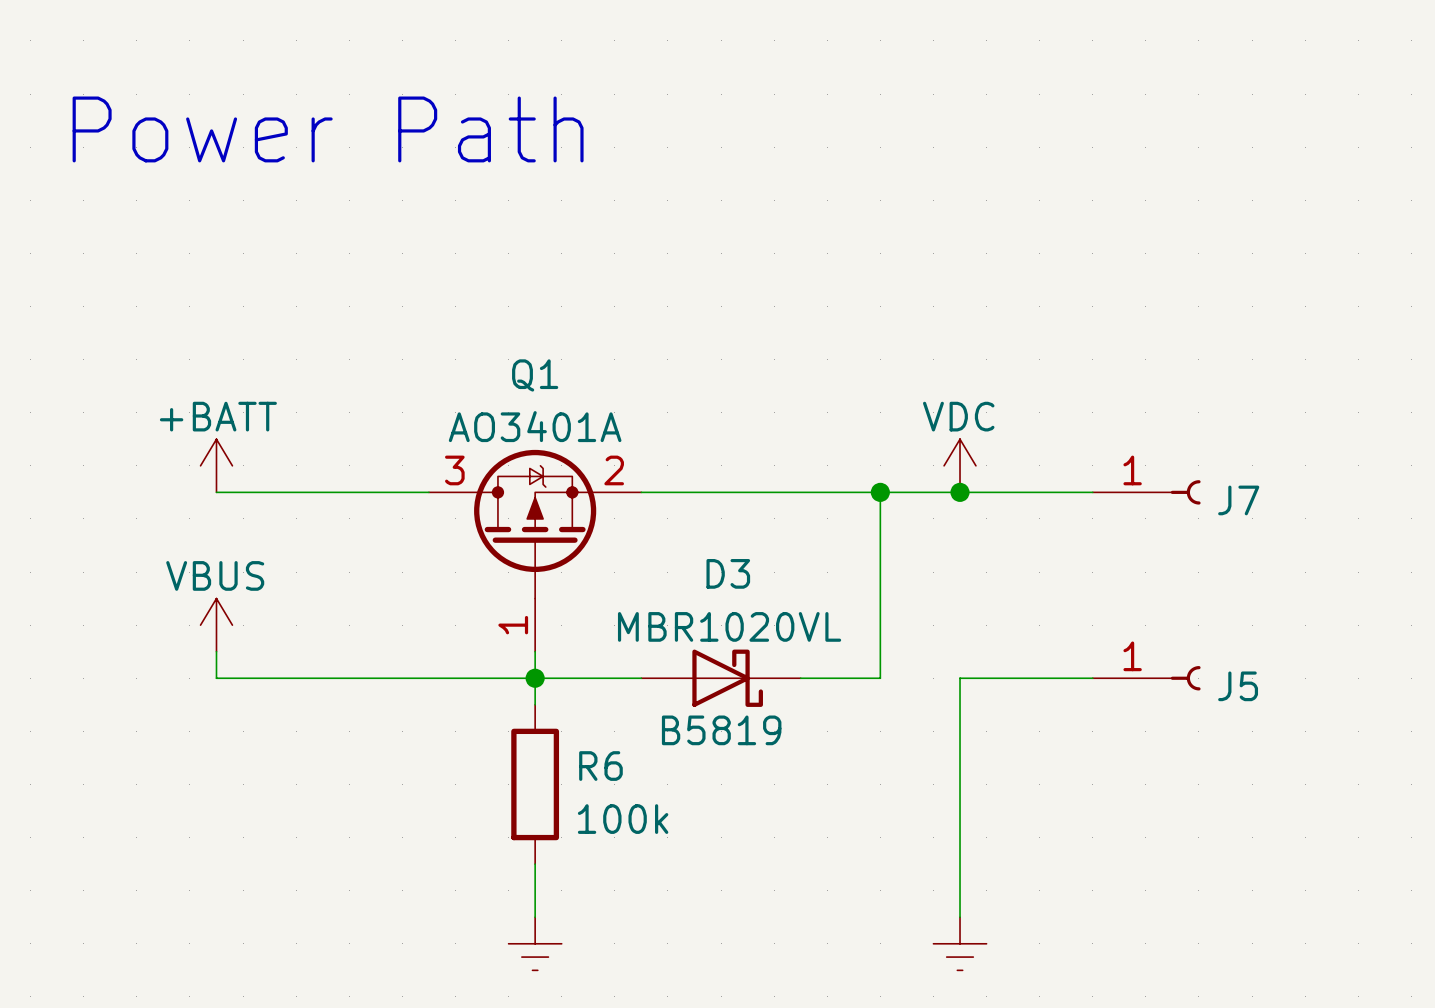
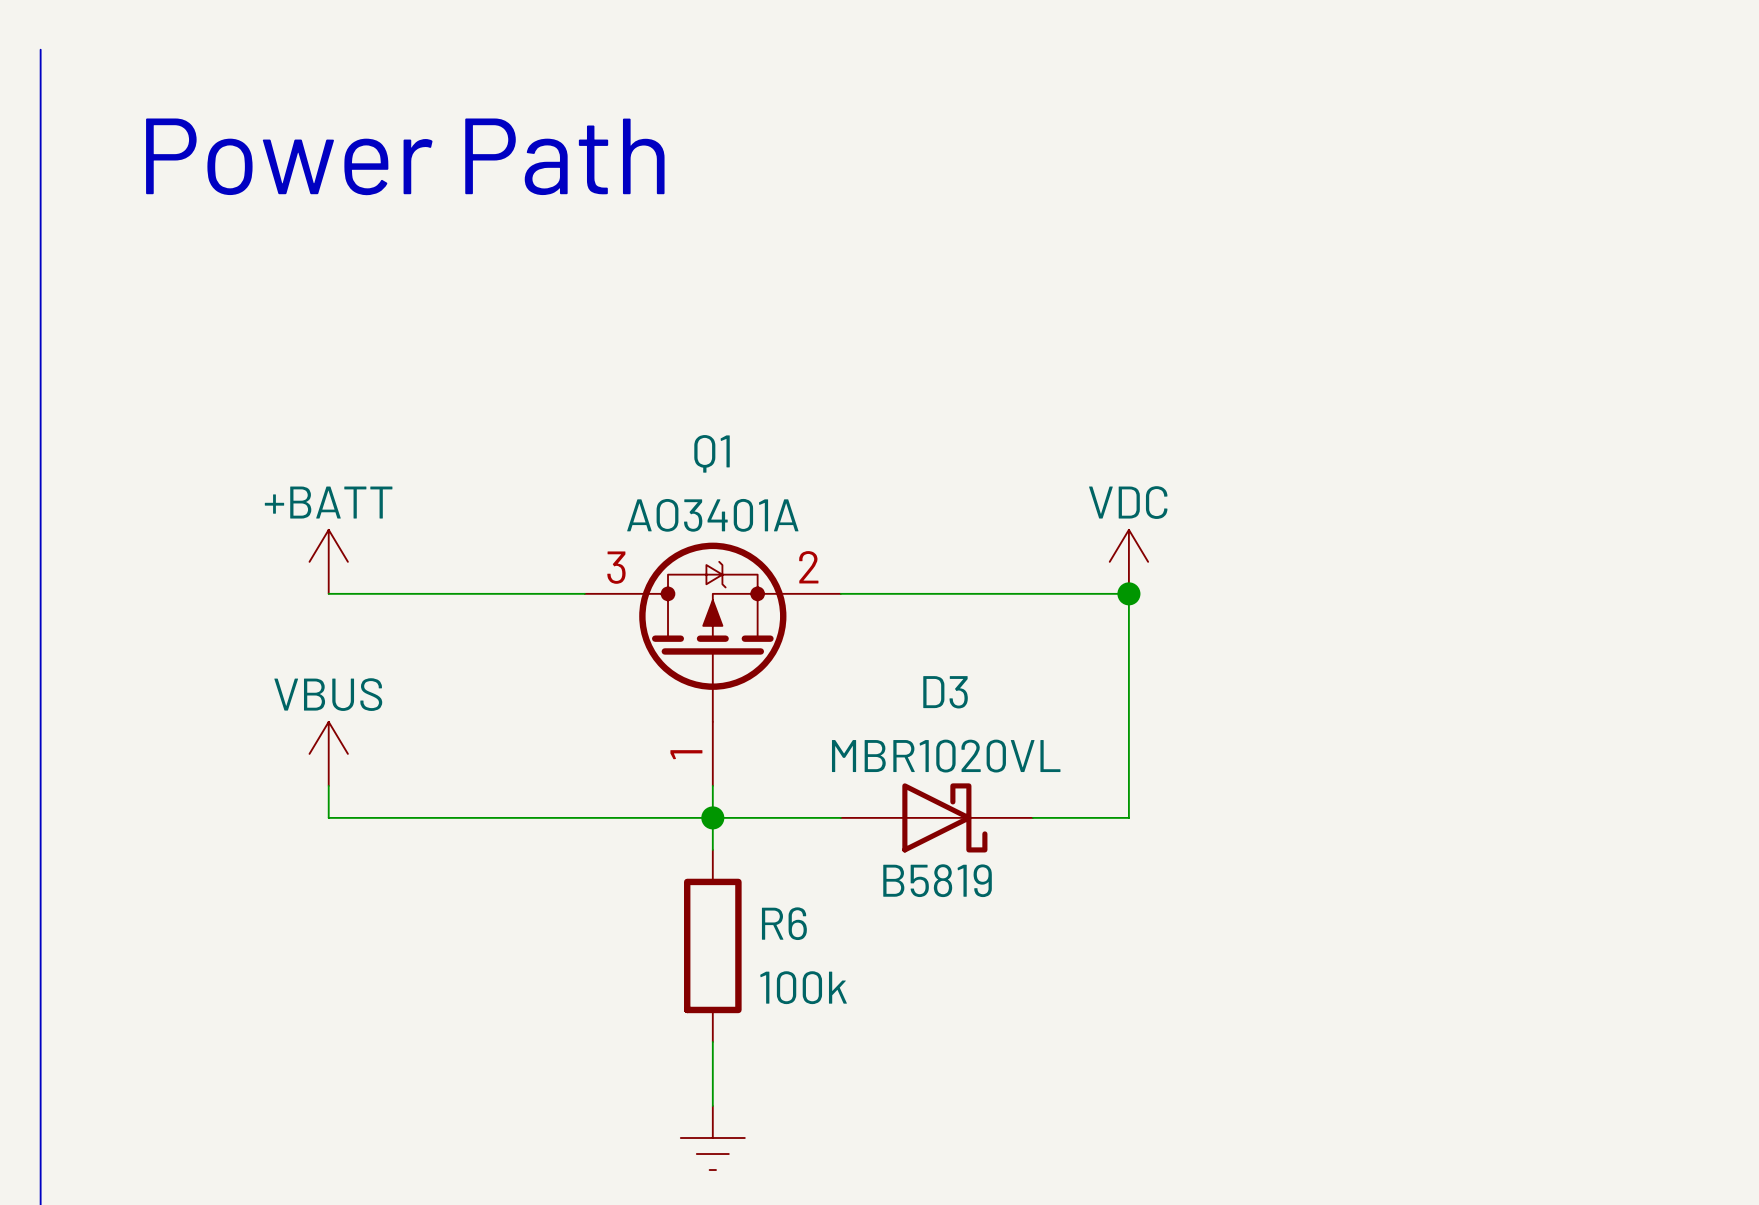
power symbol position: VDC (960, 465) -> VDC (1128, 561)
wire: (880, 492) (1092, 492) -> none
junction: (960, 492) -> none
J7: (1146, 492) -> none
wire: (1092, 678) (960, 678) (960, 917) -> none
J5: (1146, 678) -> none
power symbol: (960, 943) -> none

